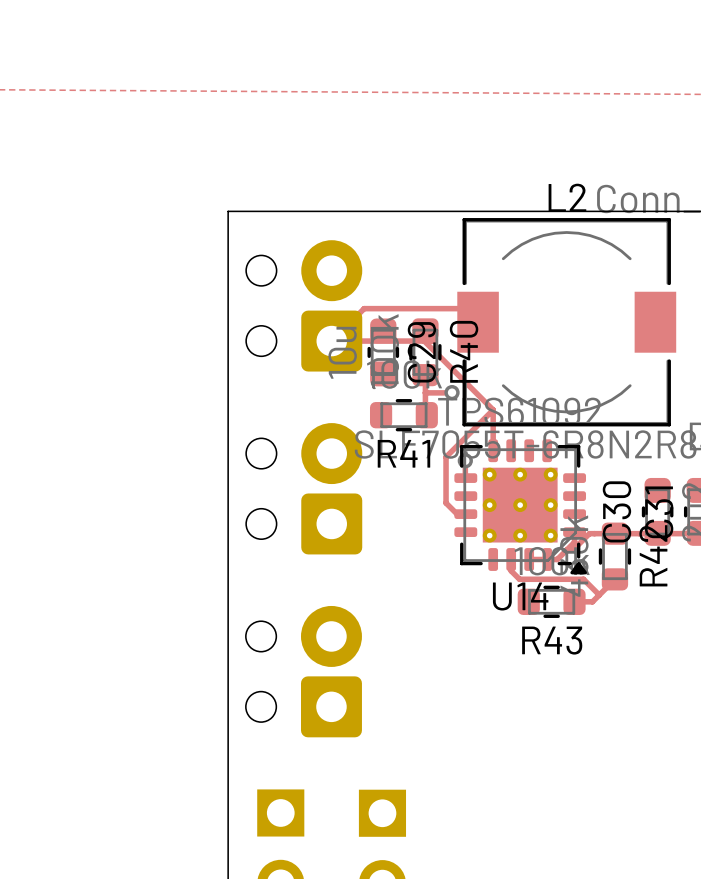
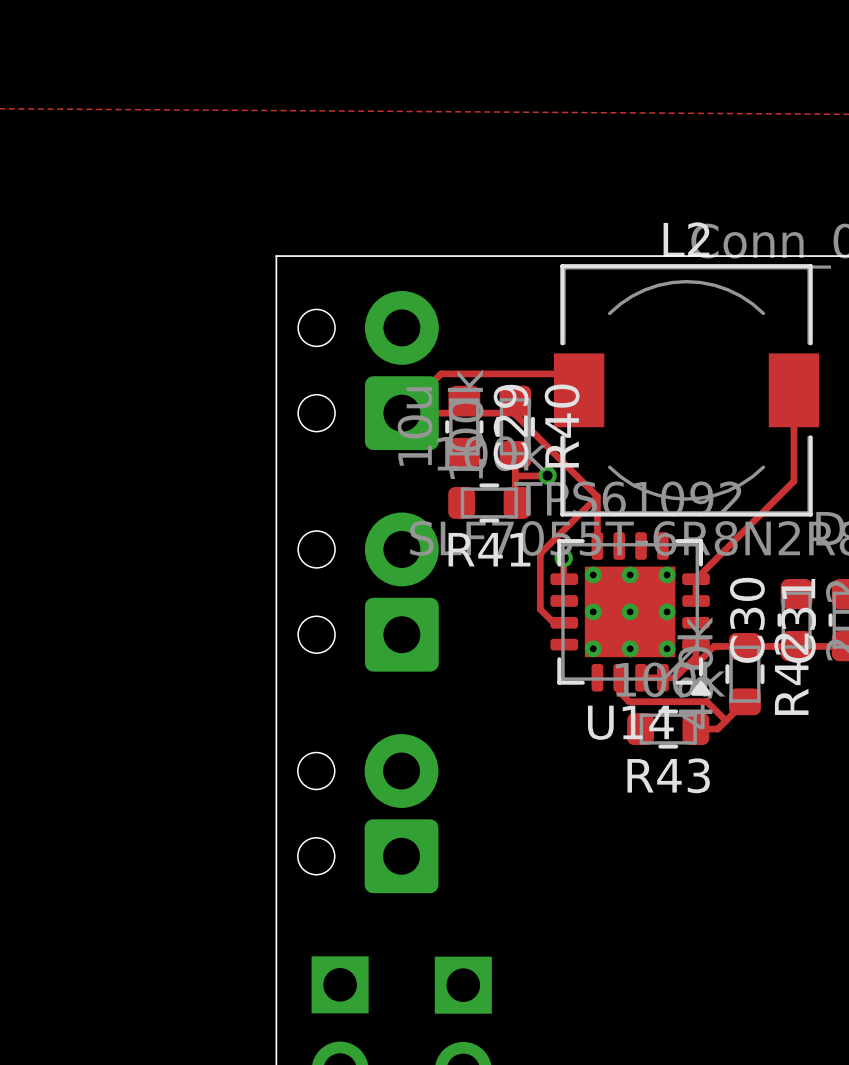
track: none -> (793, 390) (793, 481) (696, 579) (696, 600)

